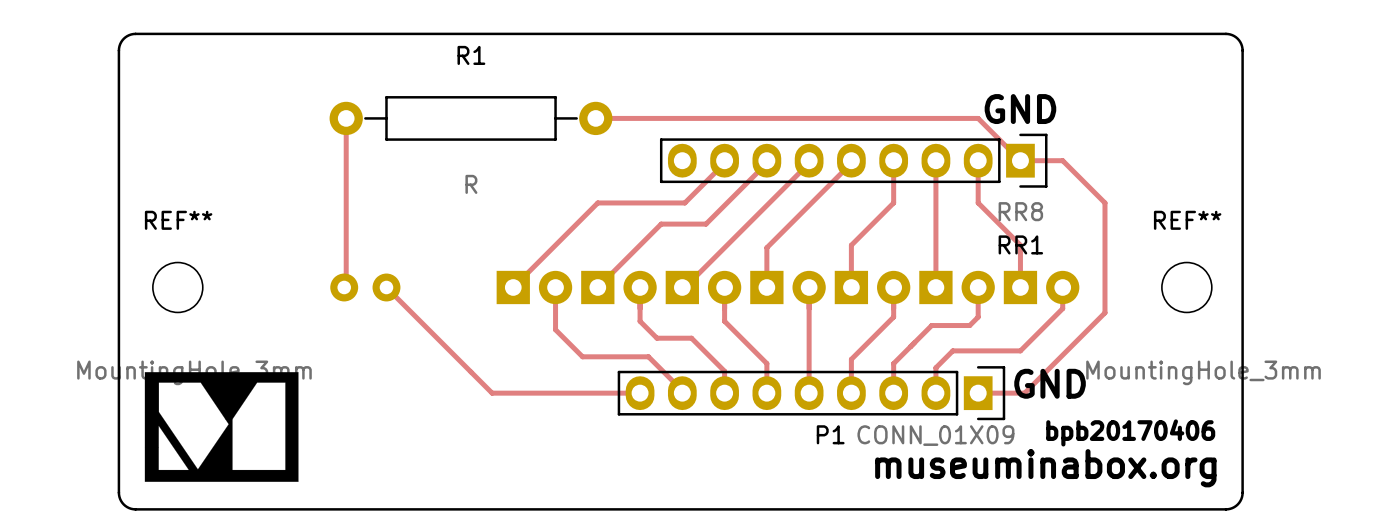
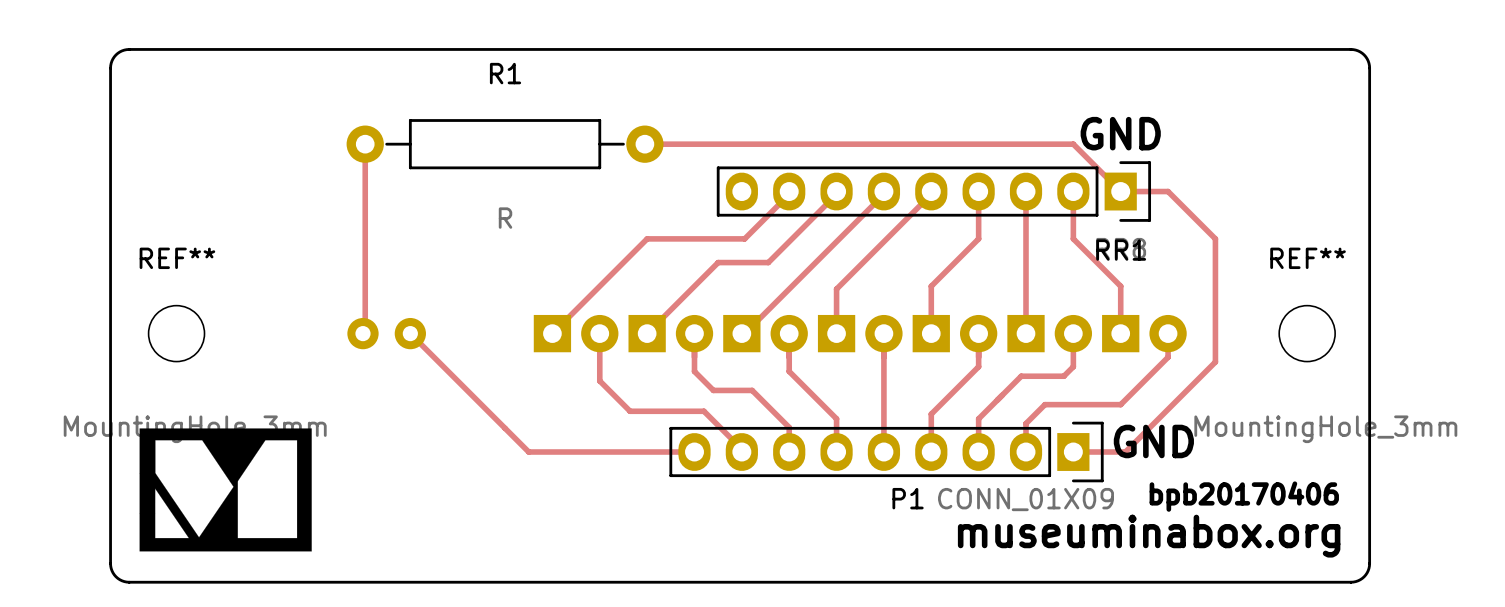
RR1 name position: RR1 (1020, 244) -> RR1 (1121, 250)

